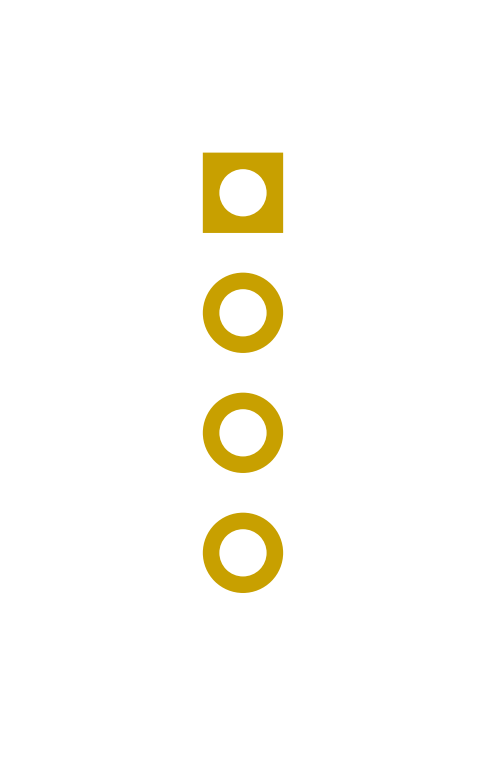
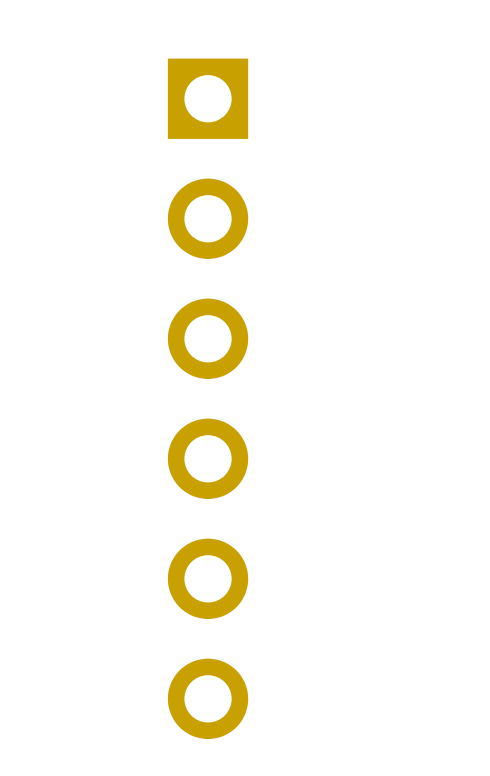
part footprint: [202, 152, 284, 594] -> [167, 58, 249, 740]

